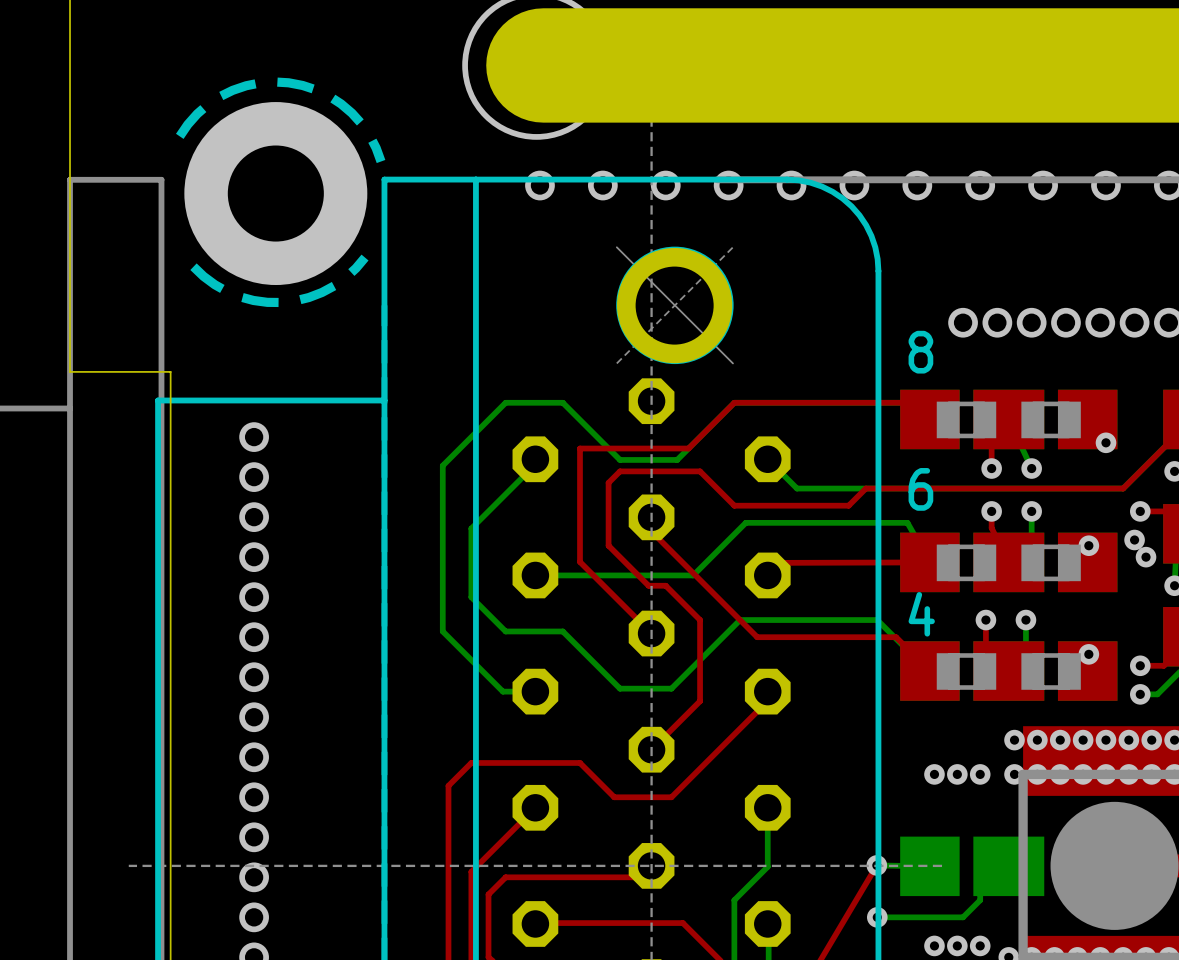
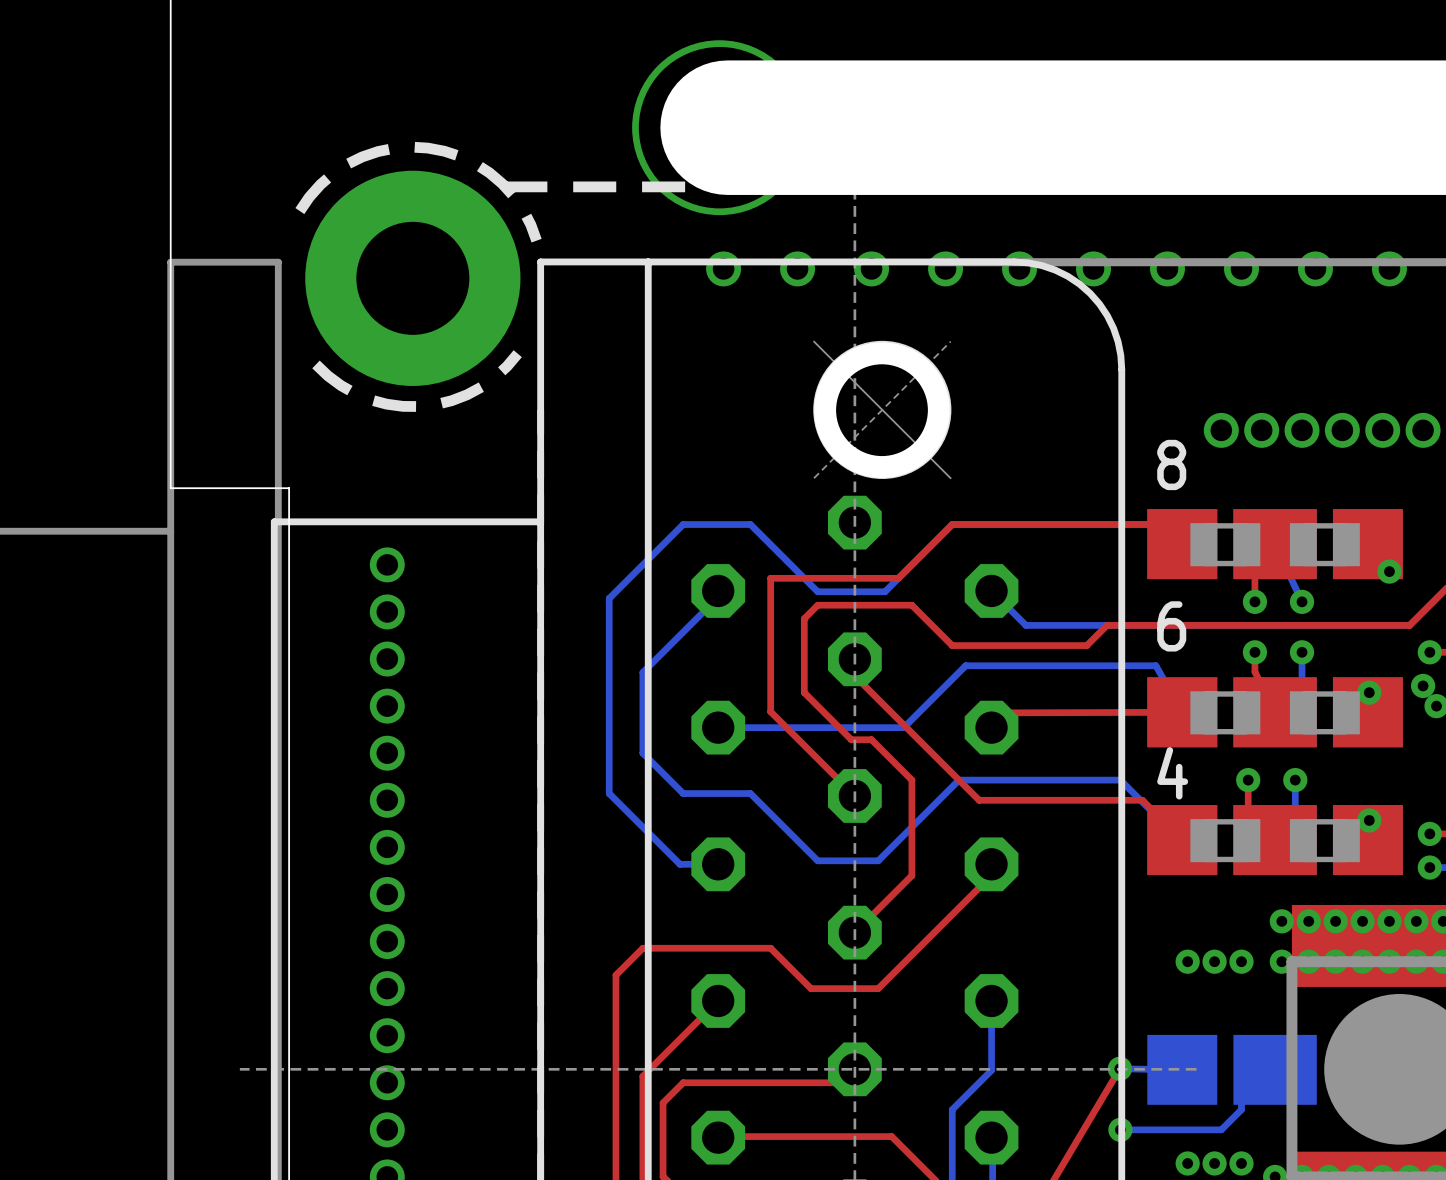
line: none -> (504, 186) (1088, 186)

